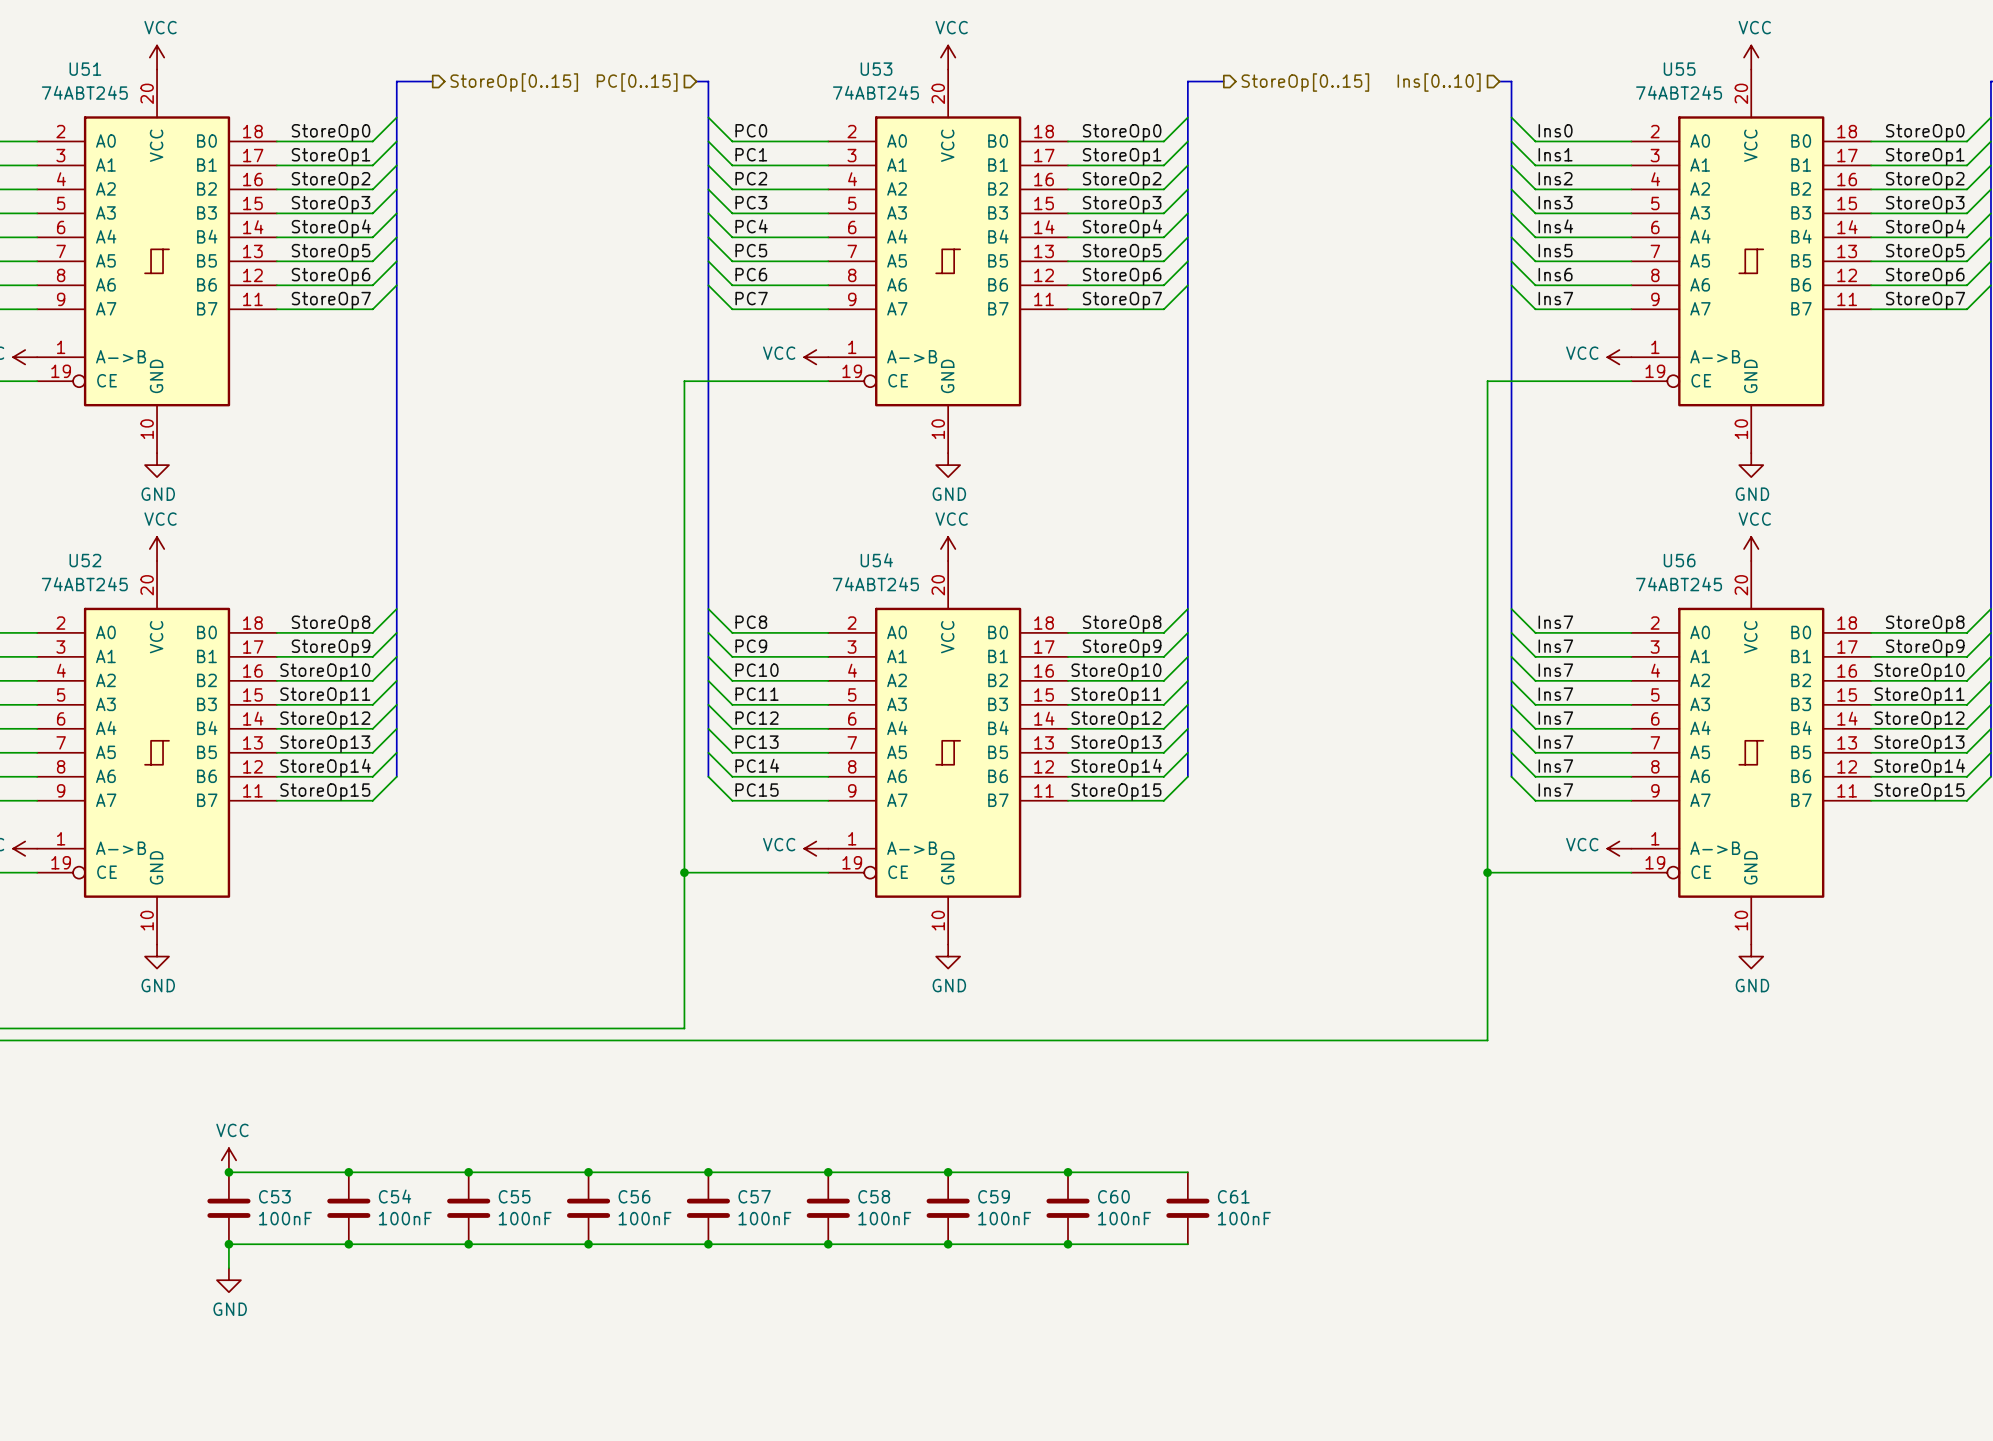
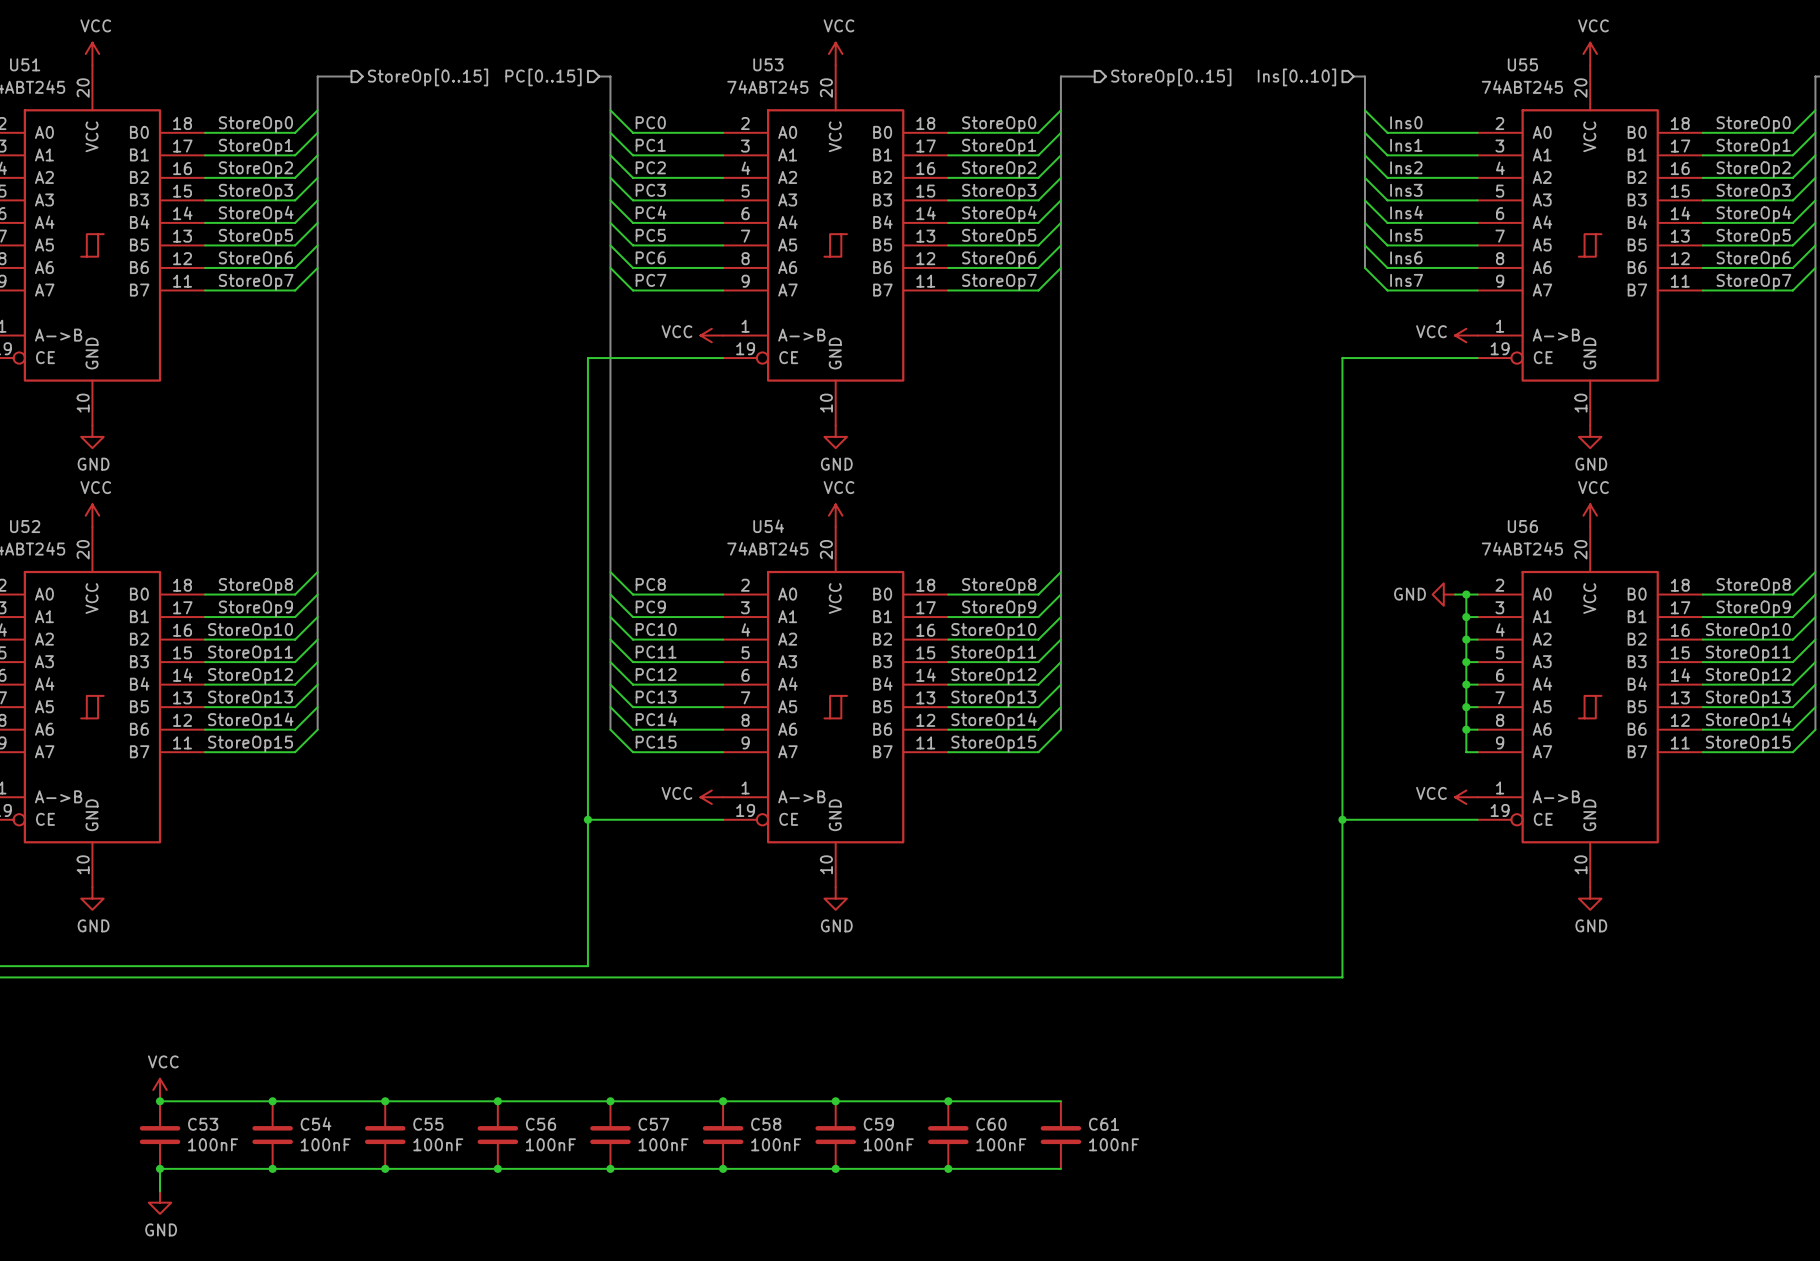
bus: (1511, 285) (1511, 776) -> none
wire: (1511, 608) (1535, 632) (1607, 632) -> none
label: Ins7 (1555, 622) -> none
wire: (1511, 632) (1535, 656) (1619, 656) -> none
power symbol: none -> GND (1443, 594)
junction: none -> (1466, 594)
label: Ins7 (1555, 646) -> none
wire: (1511, 656) (1535, 680) (1619, 680) -> none
junction: none -> (1466, 617)
label: Ins7 (1555, 670) -> none
wire: (1511, 680) (1535, 704) (1619, 704) -> none
junction: none -> (1466, 639)
label: Ins7 (1555, 694) -> none
wire: (1511, 704) (1535, 728) (1619, 728) -> none
junction: none -> (1466, 662)
label: Ins7 (1555, 718) -> none
wire: (1511, 728) (1535, 752) (1619, 752) -> none
junction: none -> (1466, 684)
label: Ins7 (1555, 742) -> none
wire: (1511, 752) (1535, 776) (1619, 776) -> none
junction: none -> (1466, 707)
label: Ins7 (1555, 766) -> none
wire: (1511, 776) (1535, 800) (1619, 800) -> (1466, 594) (1466, 752)
junction: none -> (1466, 729)
label: Ins7 (1555, 790) -> none

